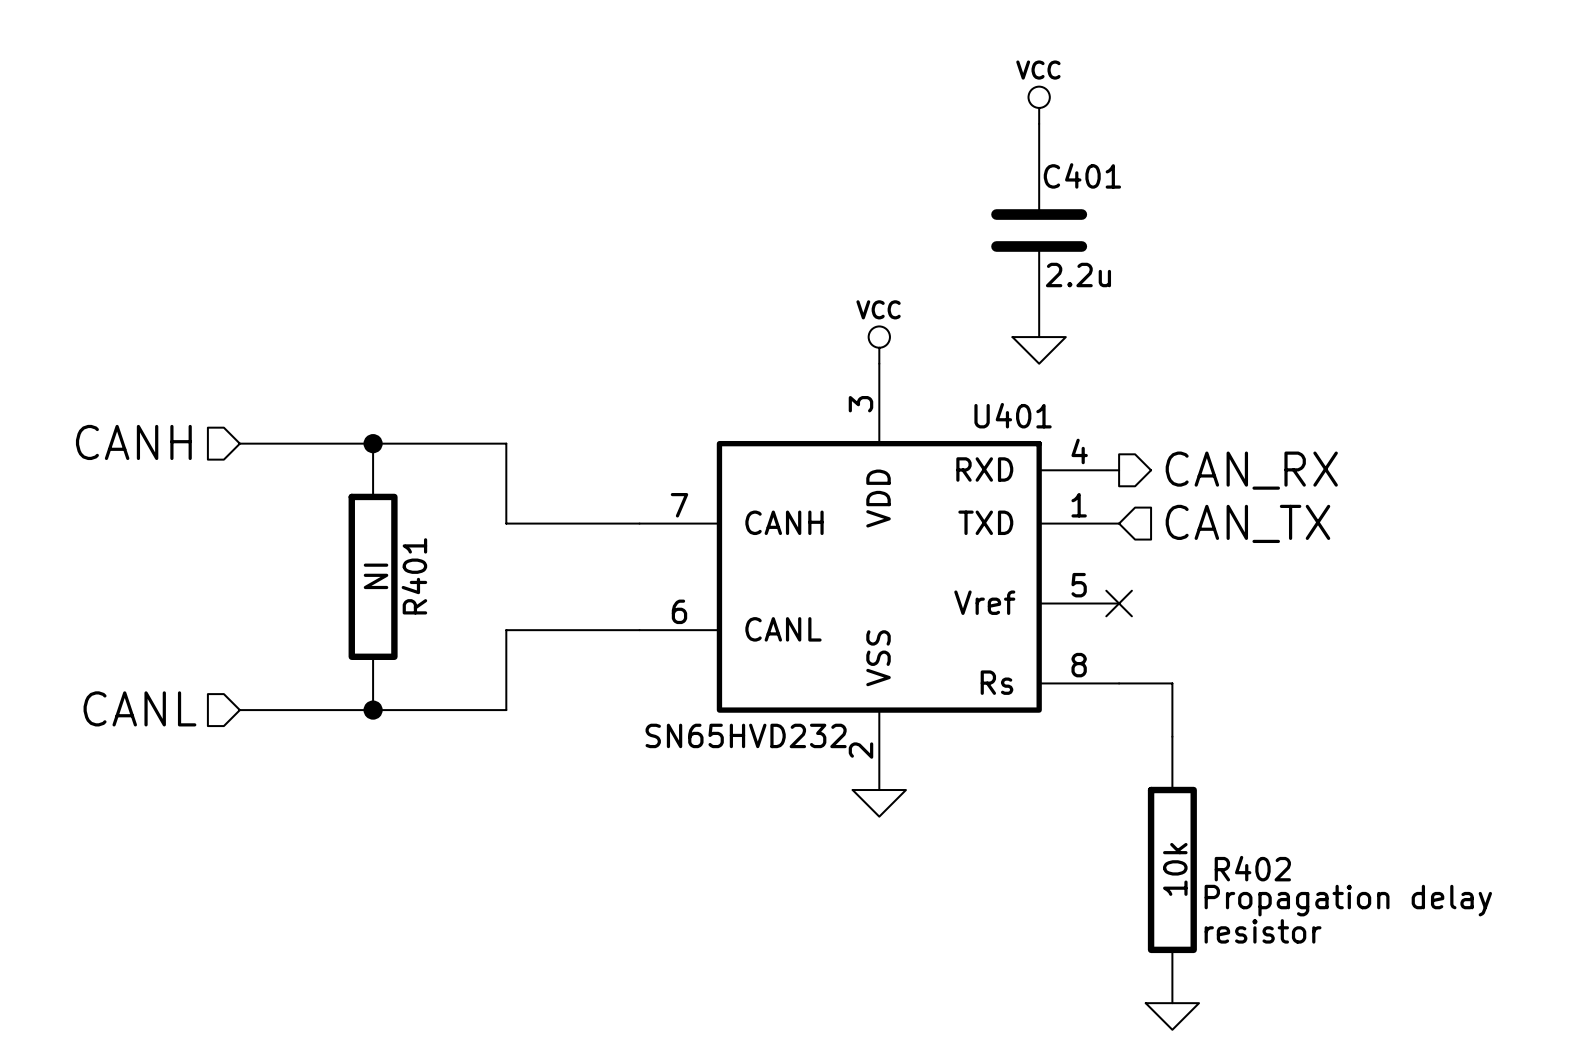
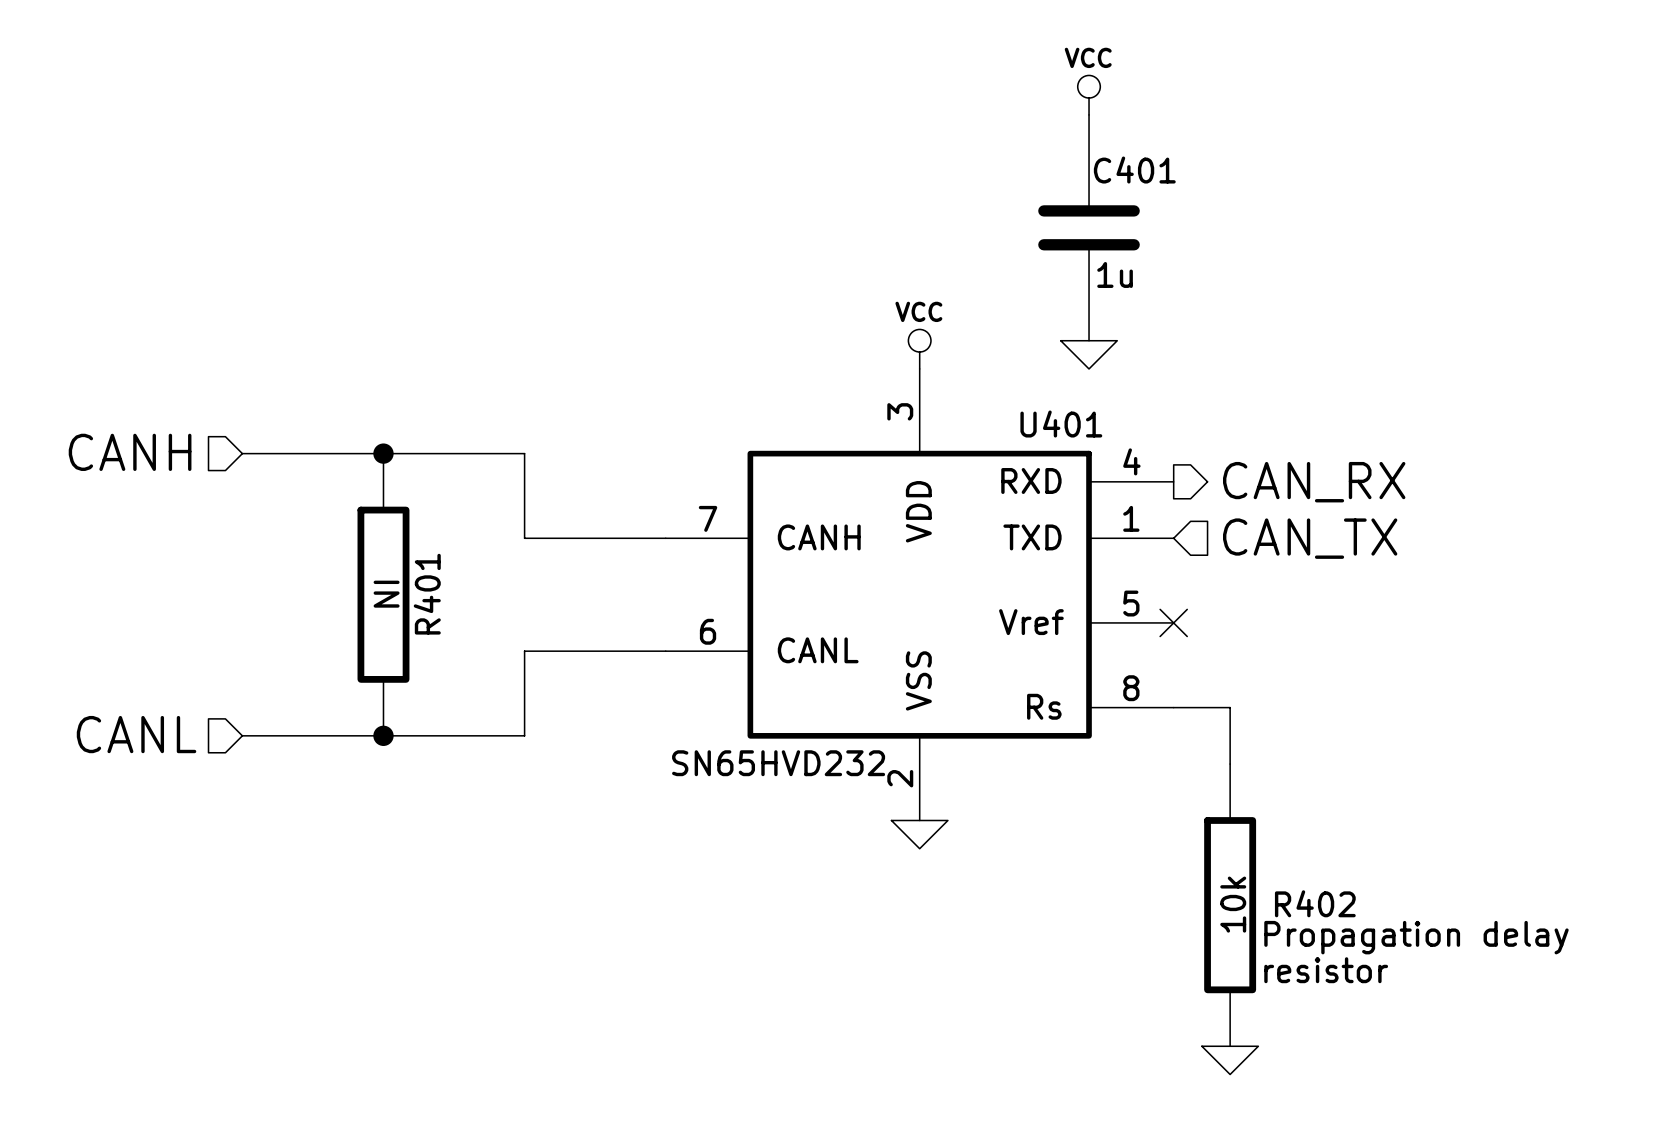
C401 value: 2.2u (1078, 275) -> 1u (1115, 274)

